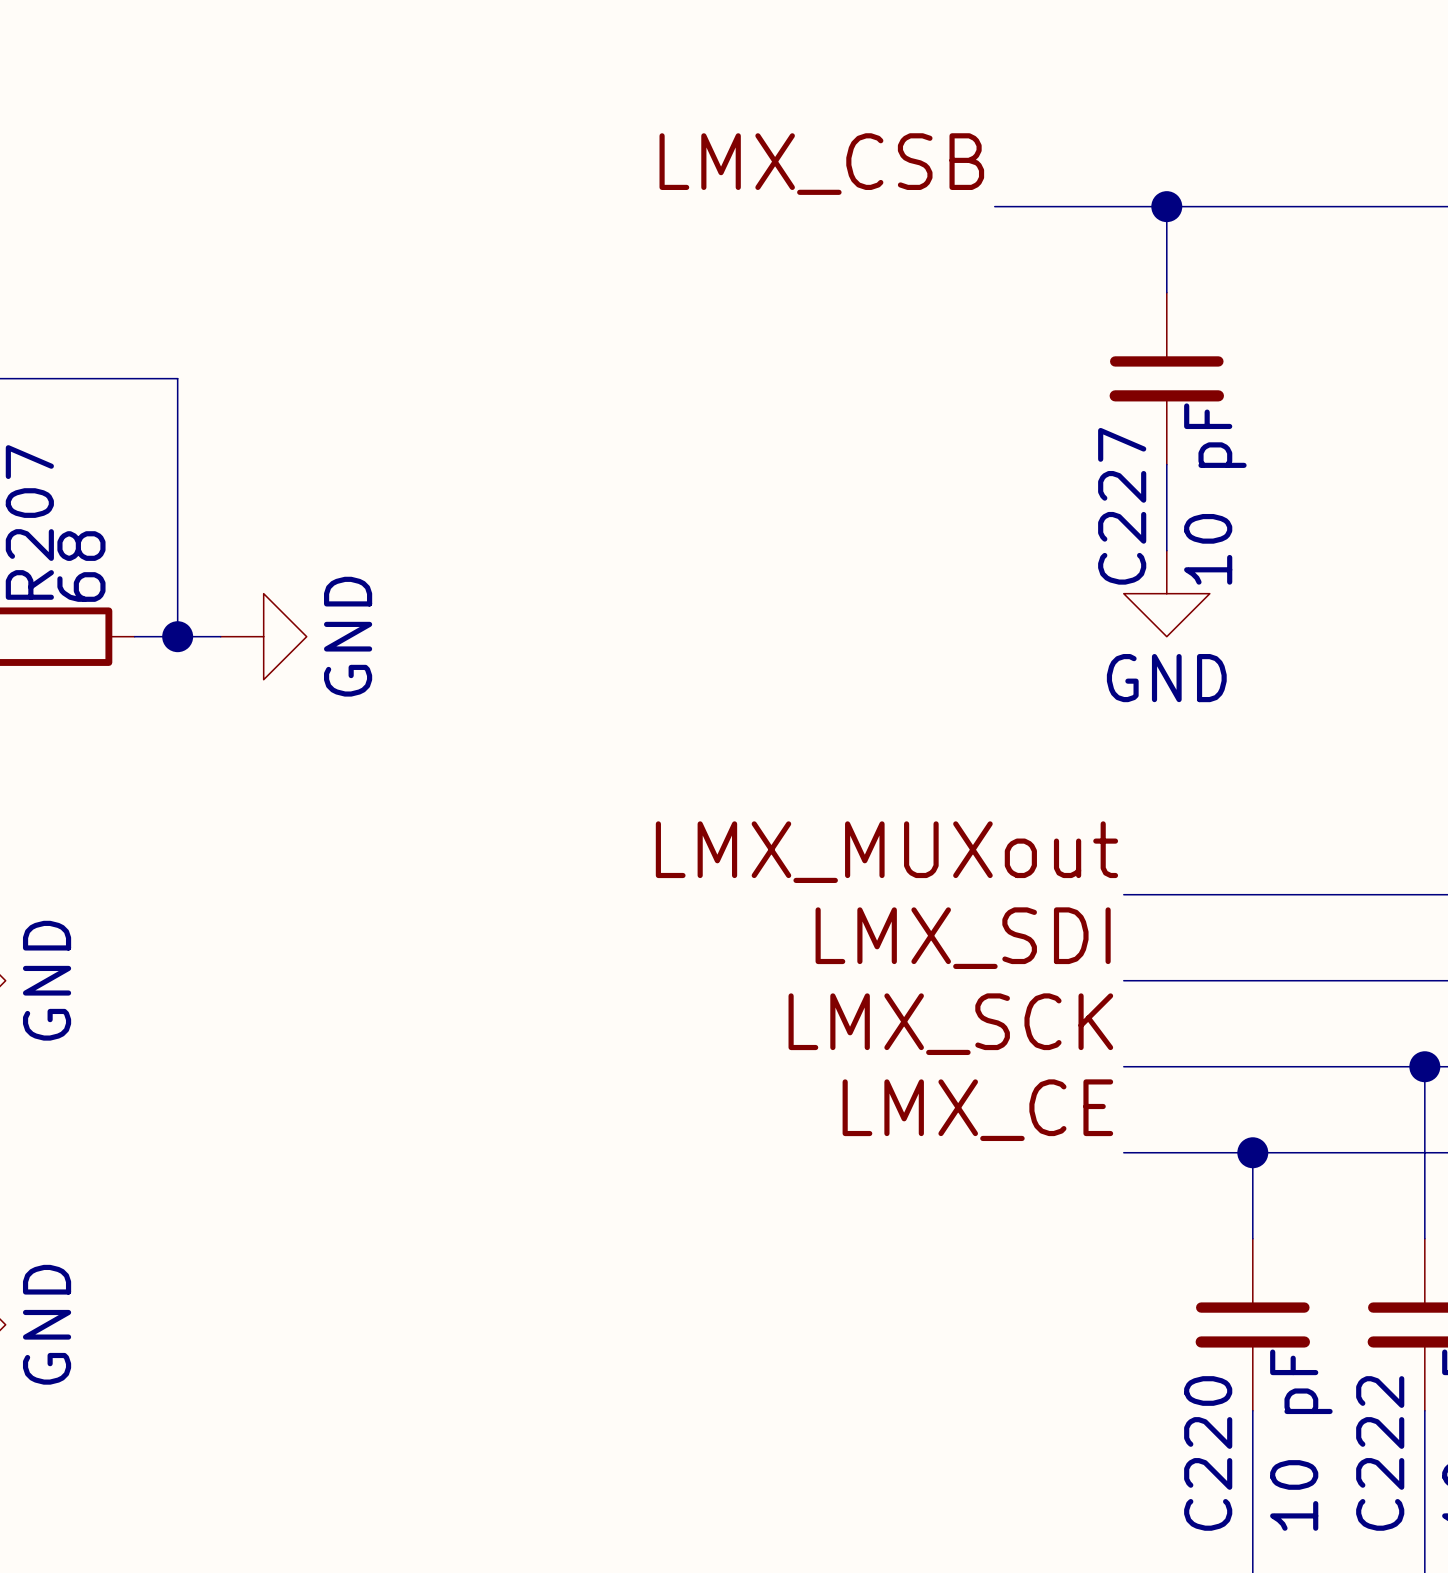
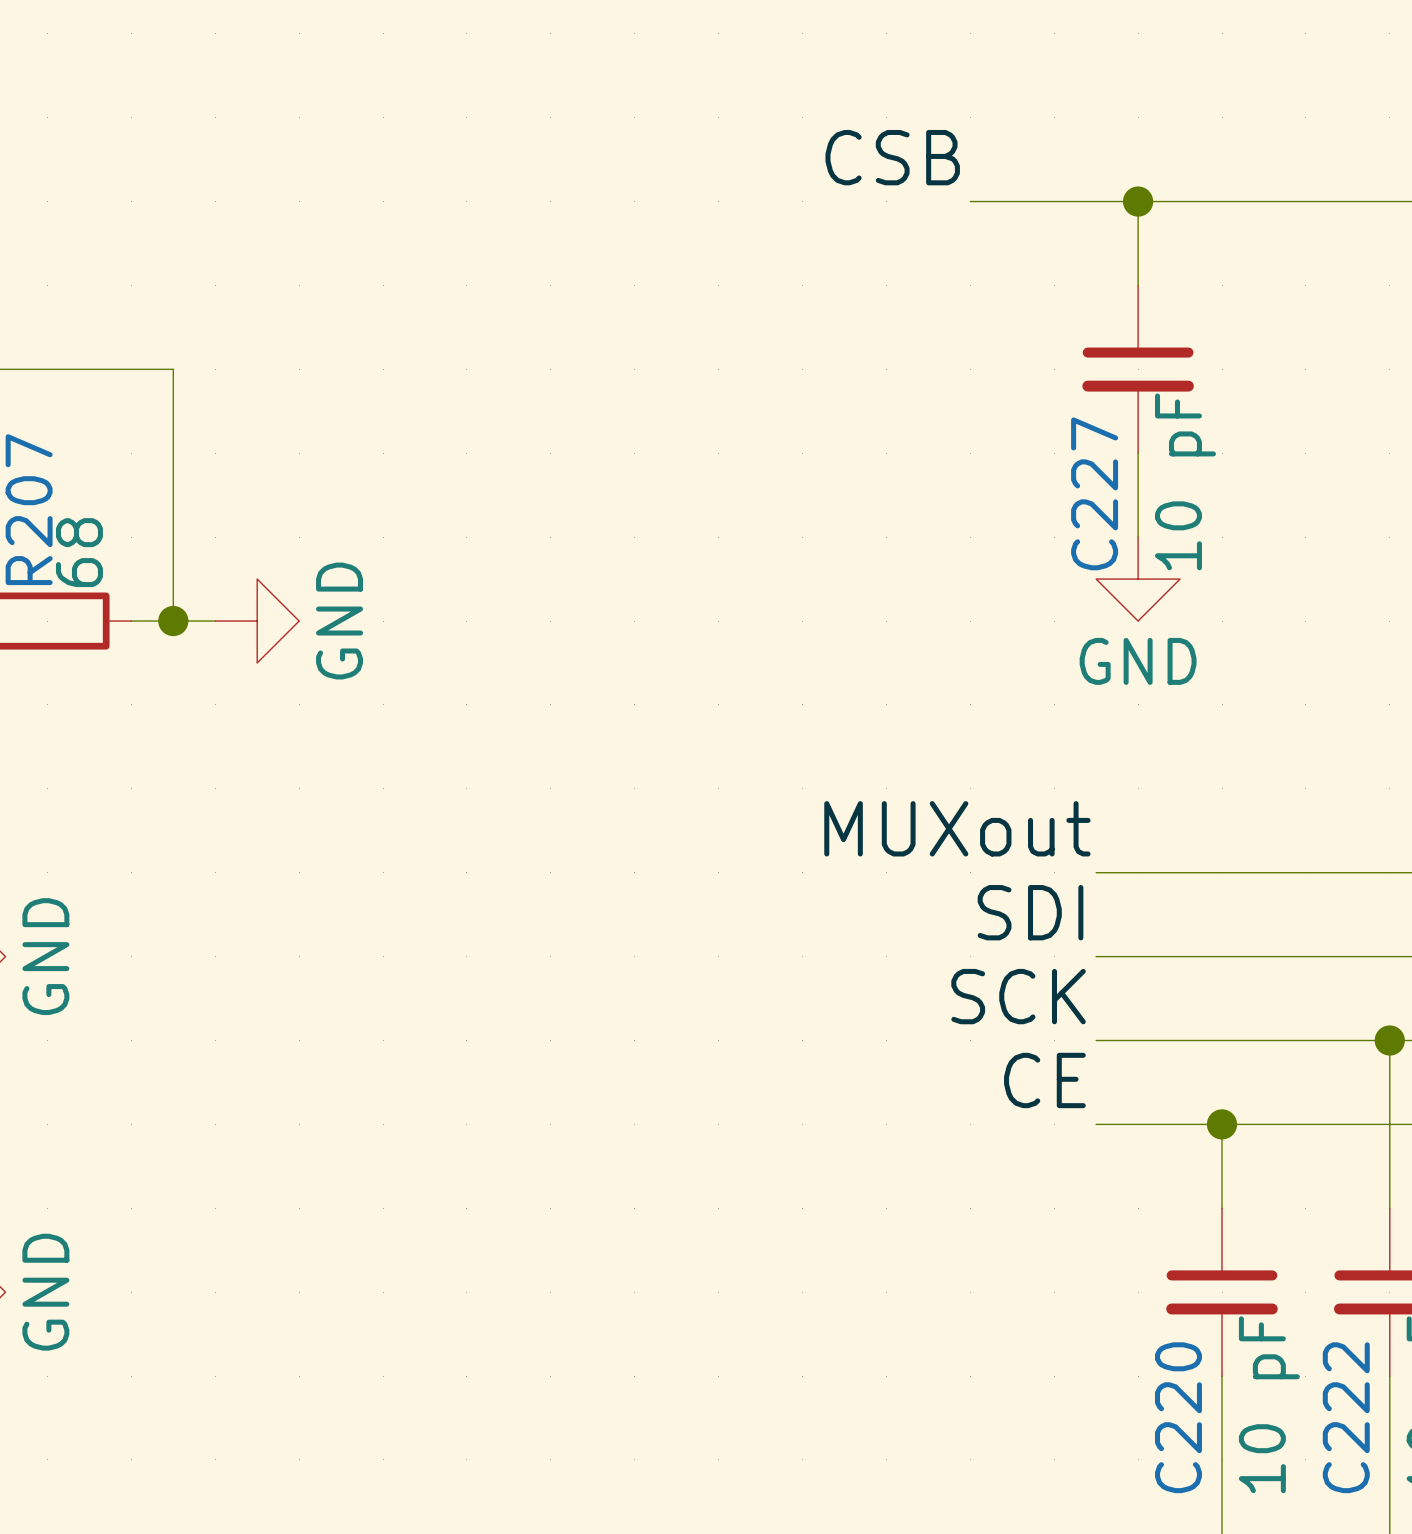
label: LMX_CSB (821, 164) -> CSB (892, 157)
label: LMX_MUXout (886, 852) -> MUXout (957, 828)
label: LMX_SDI (963, 938) -> SDI (1030, 912)
label: LMX_SCK (950, 1024) -> SCK (1018, 996)
label: LMX_CE (977, 1110) -> CE (1044, 1080)

